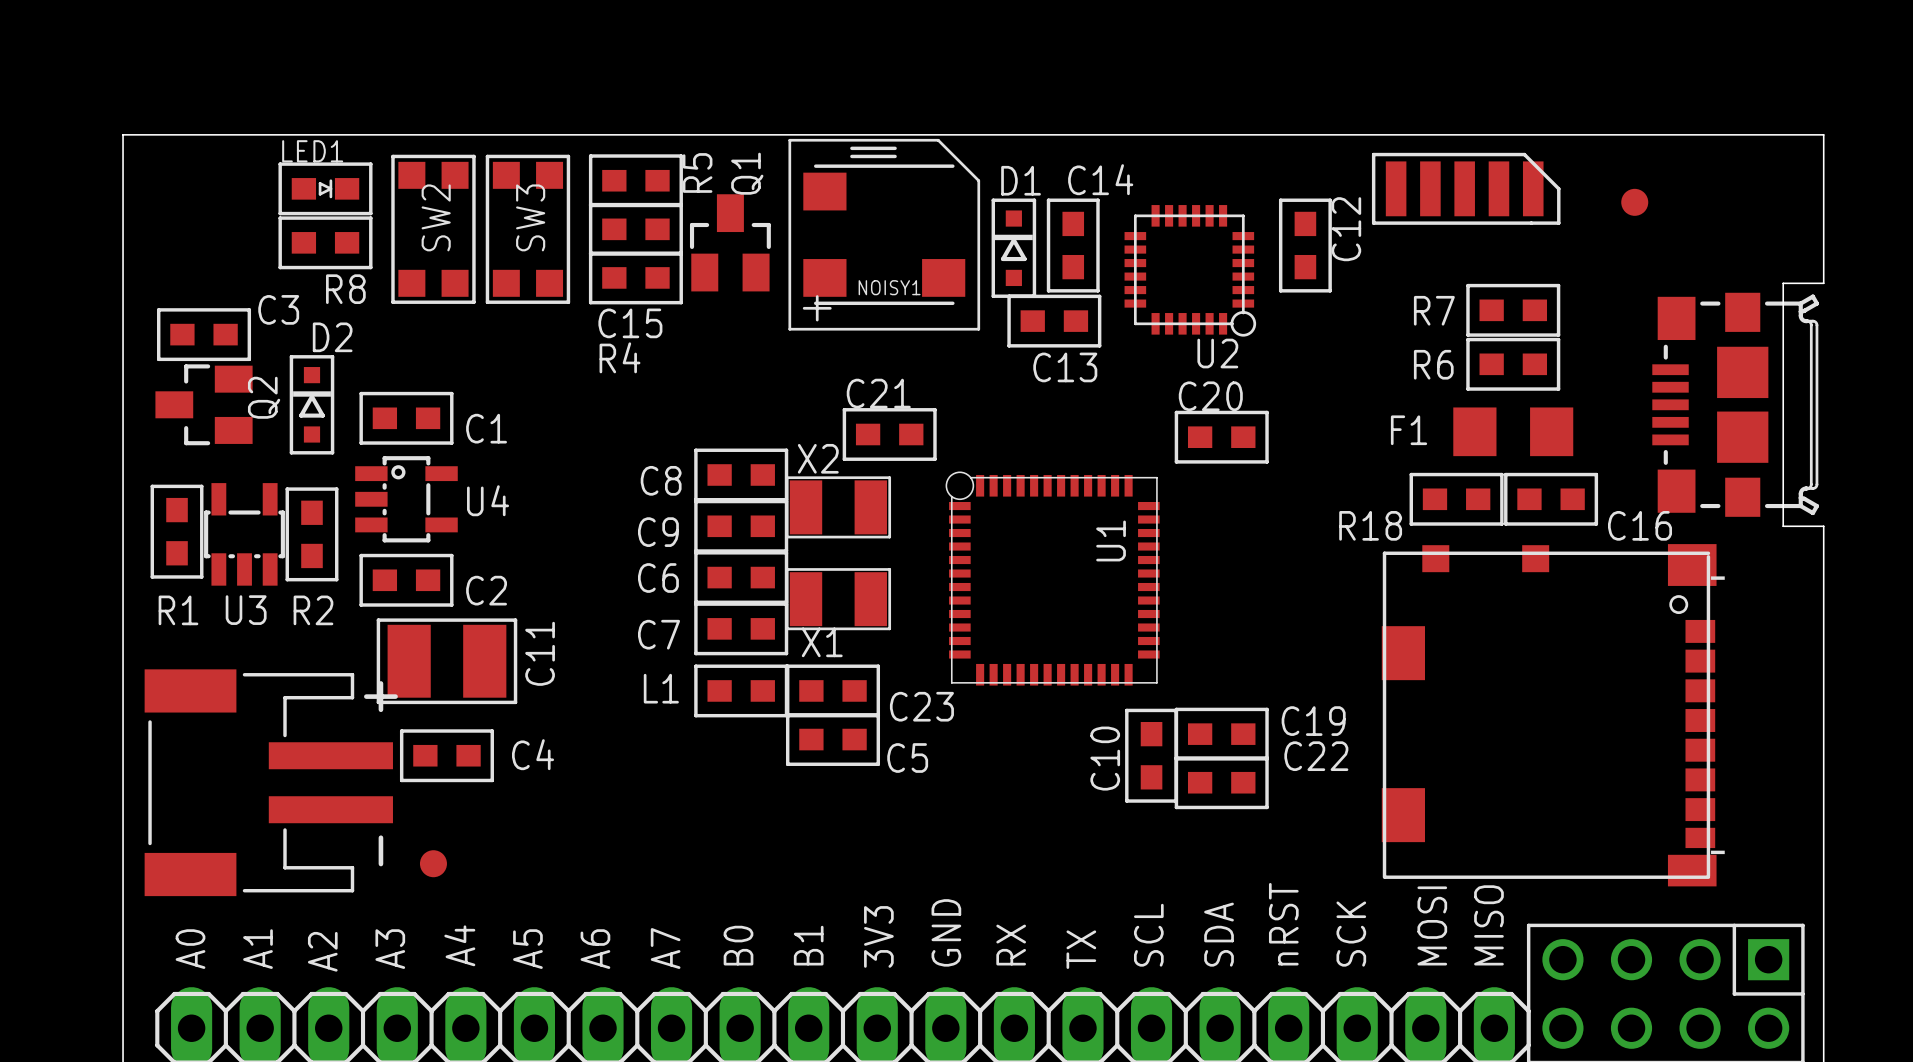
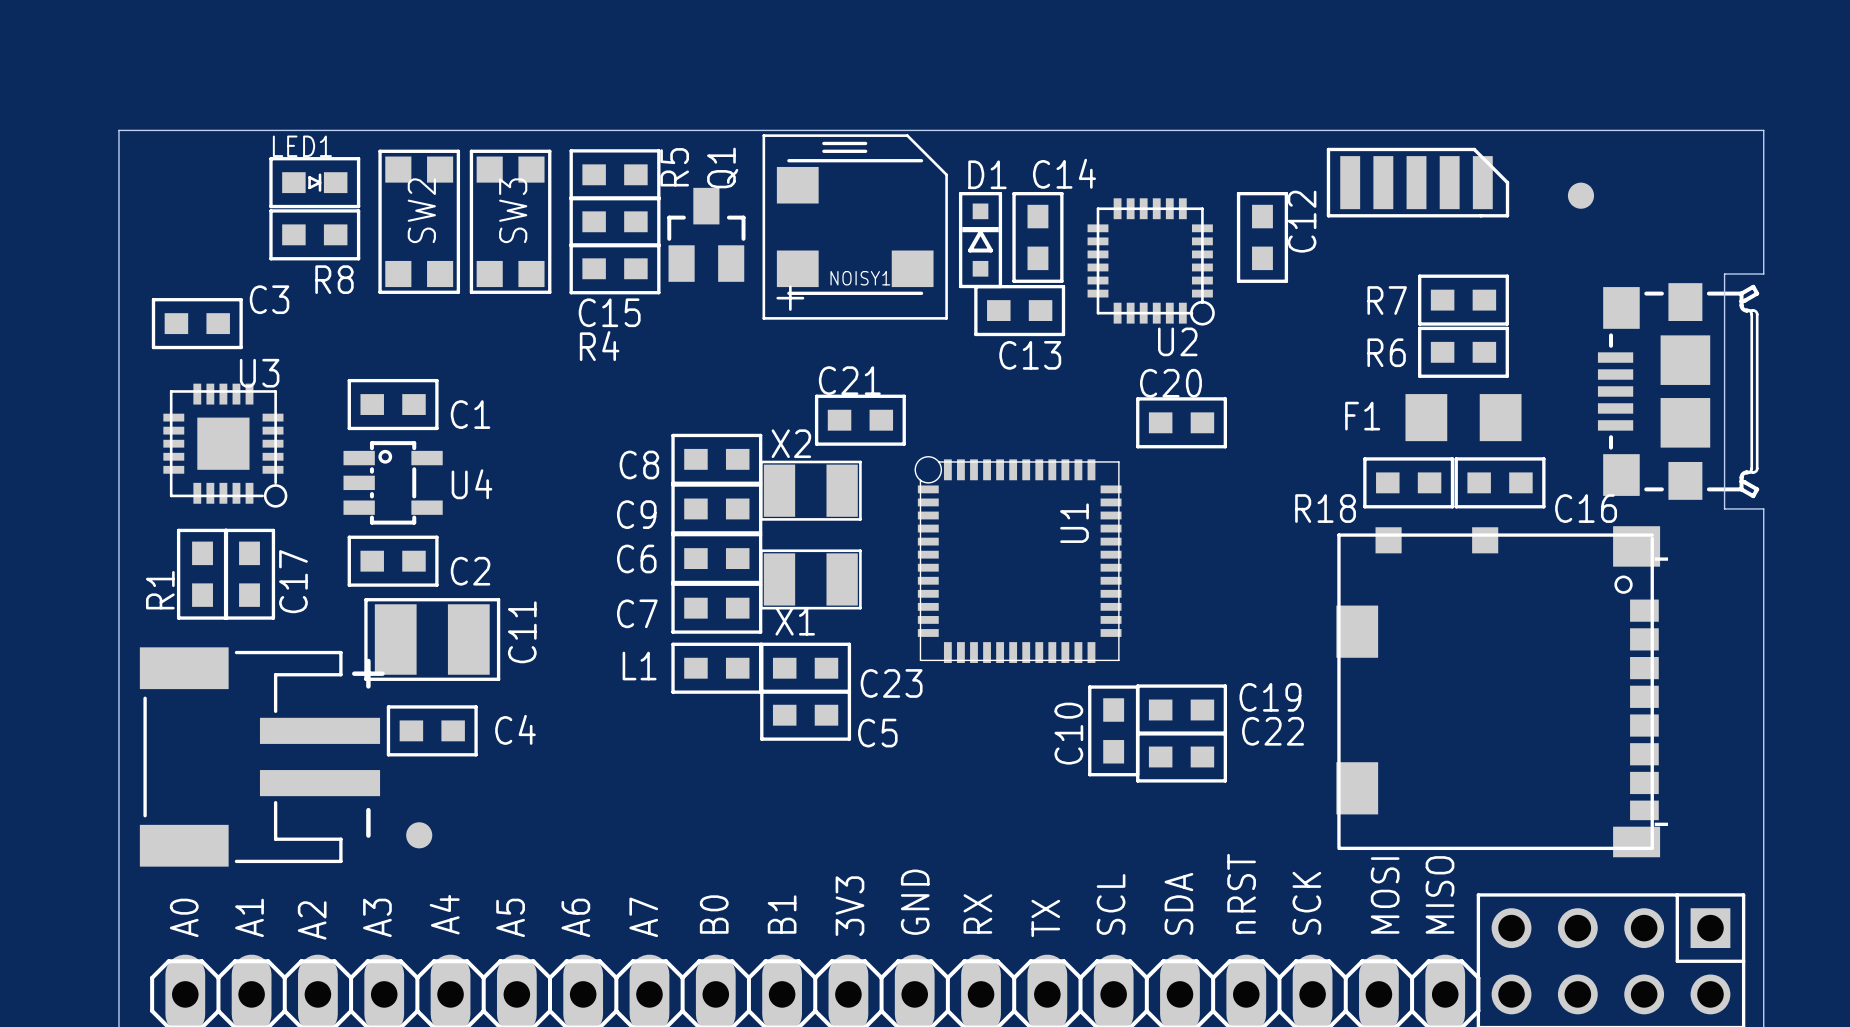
Q2: (204, 404) -> none
D2: (311, 404) -> none
U3 footprint: [204, 483, 285, 586] -> [163, 383, 288, 508]
R1 position: (177, 531) -> (202, 574)
R2: (311, 534) -> none
C17: none -> (249, 574)
R1 name rotation: 0° (178, 610) -> 90° counterclockwise (160, 590)
U3 name position: U3 (246, 610) -> U3 (259, 373)

